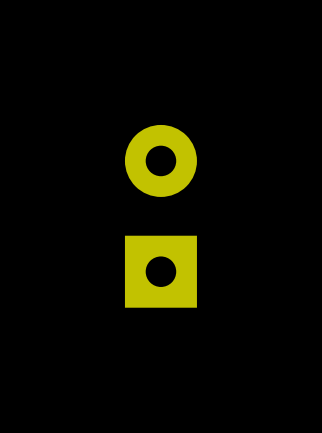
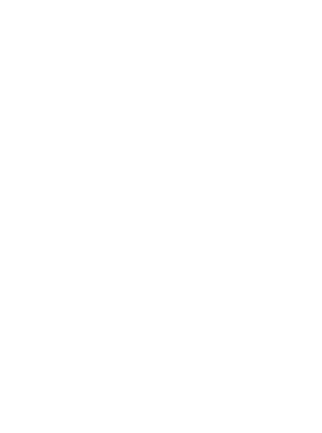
part: (160, 216) -> none

